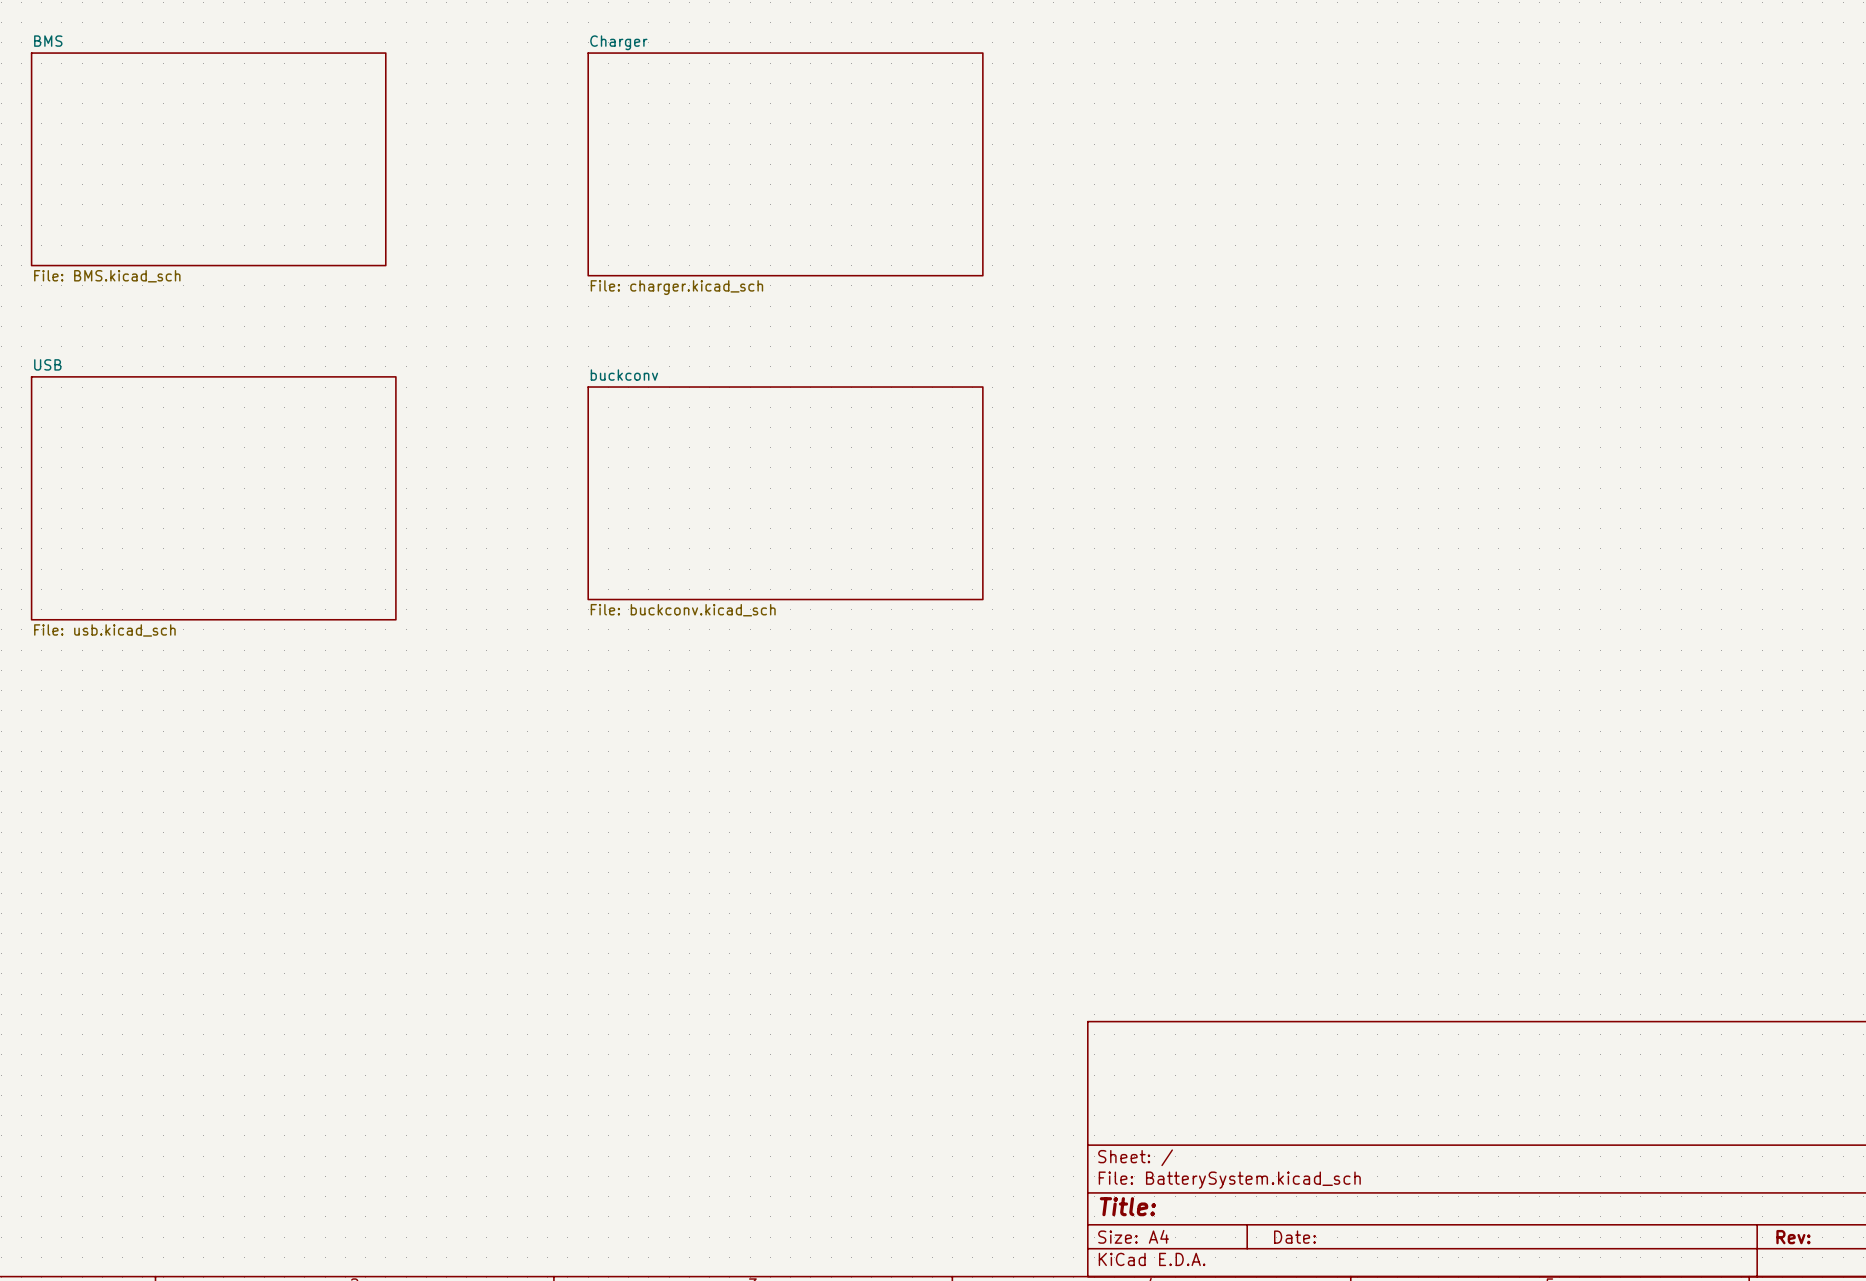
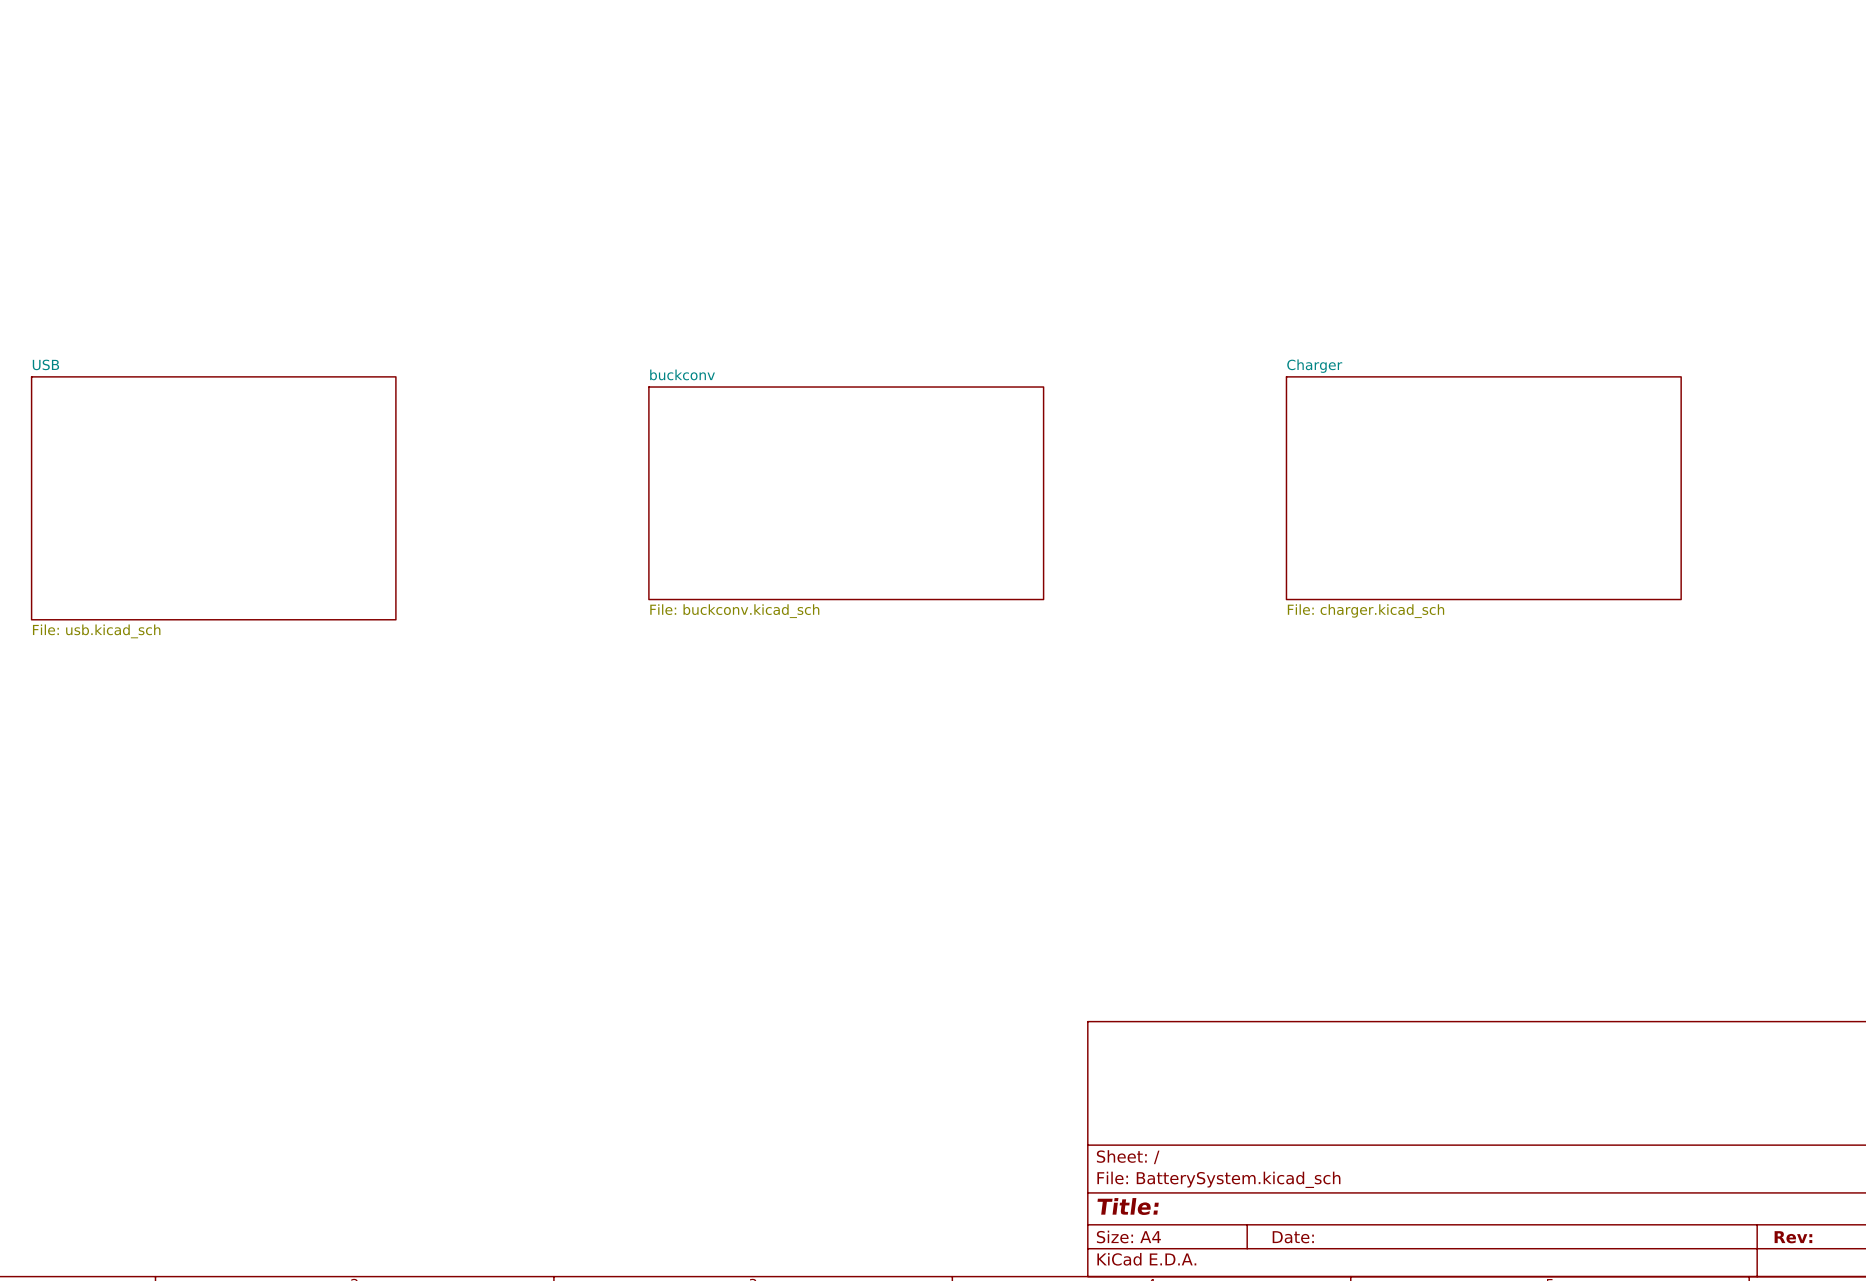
sheet BMS: File: BMS.kicad_sch (208, 159) -> none
sheet Charger: File: charger.kicad_sch (785, 164) -> none
sheet Charger: none -> File: charger.kicad_sch (1483, 488)
sheet buckconv position: (785, 493) -> (846, 493)

